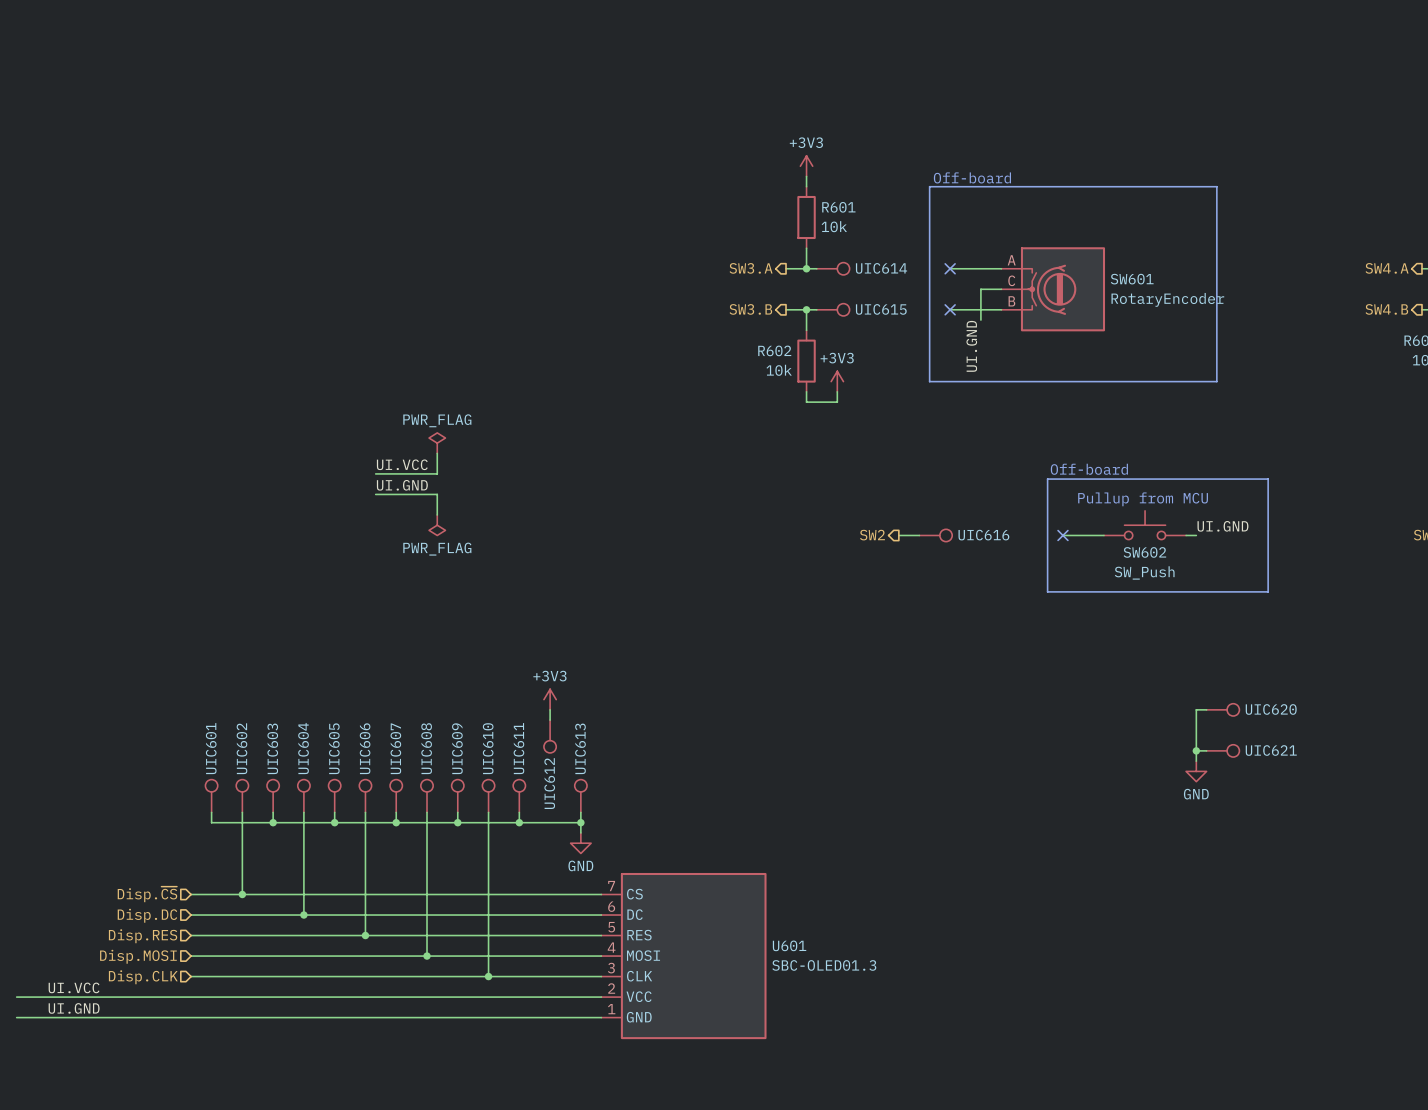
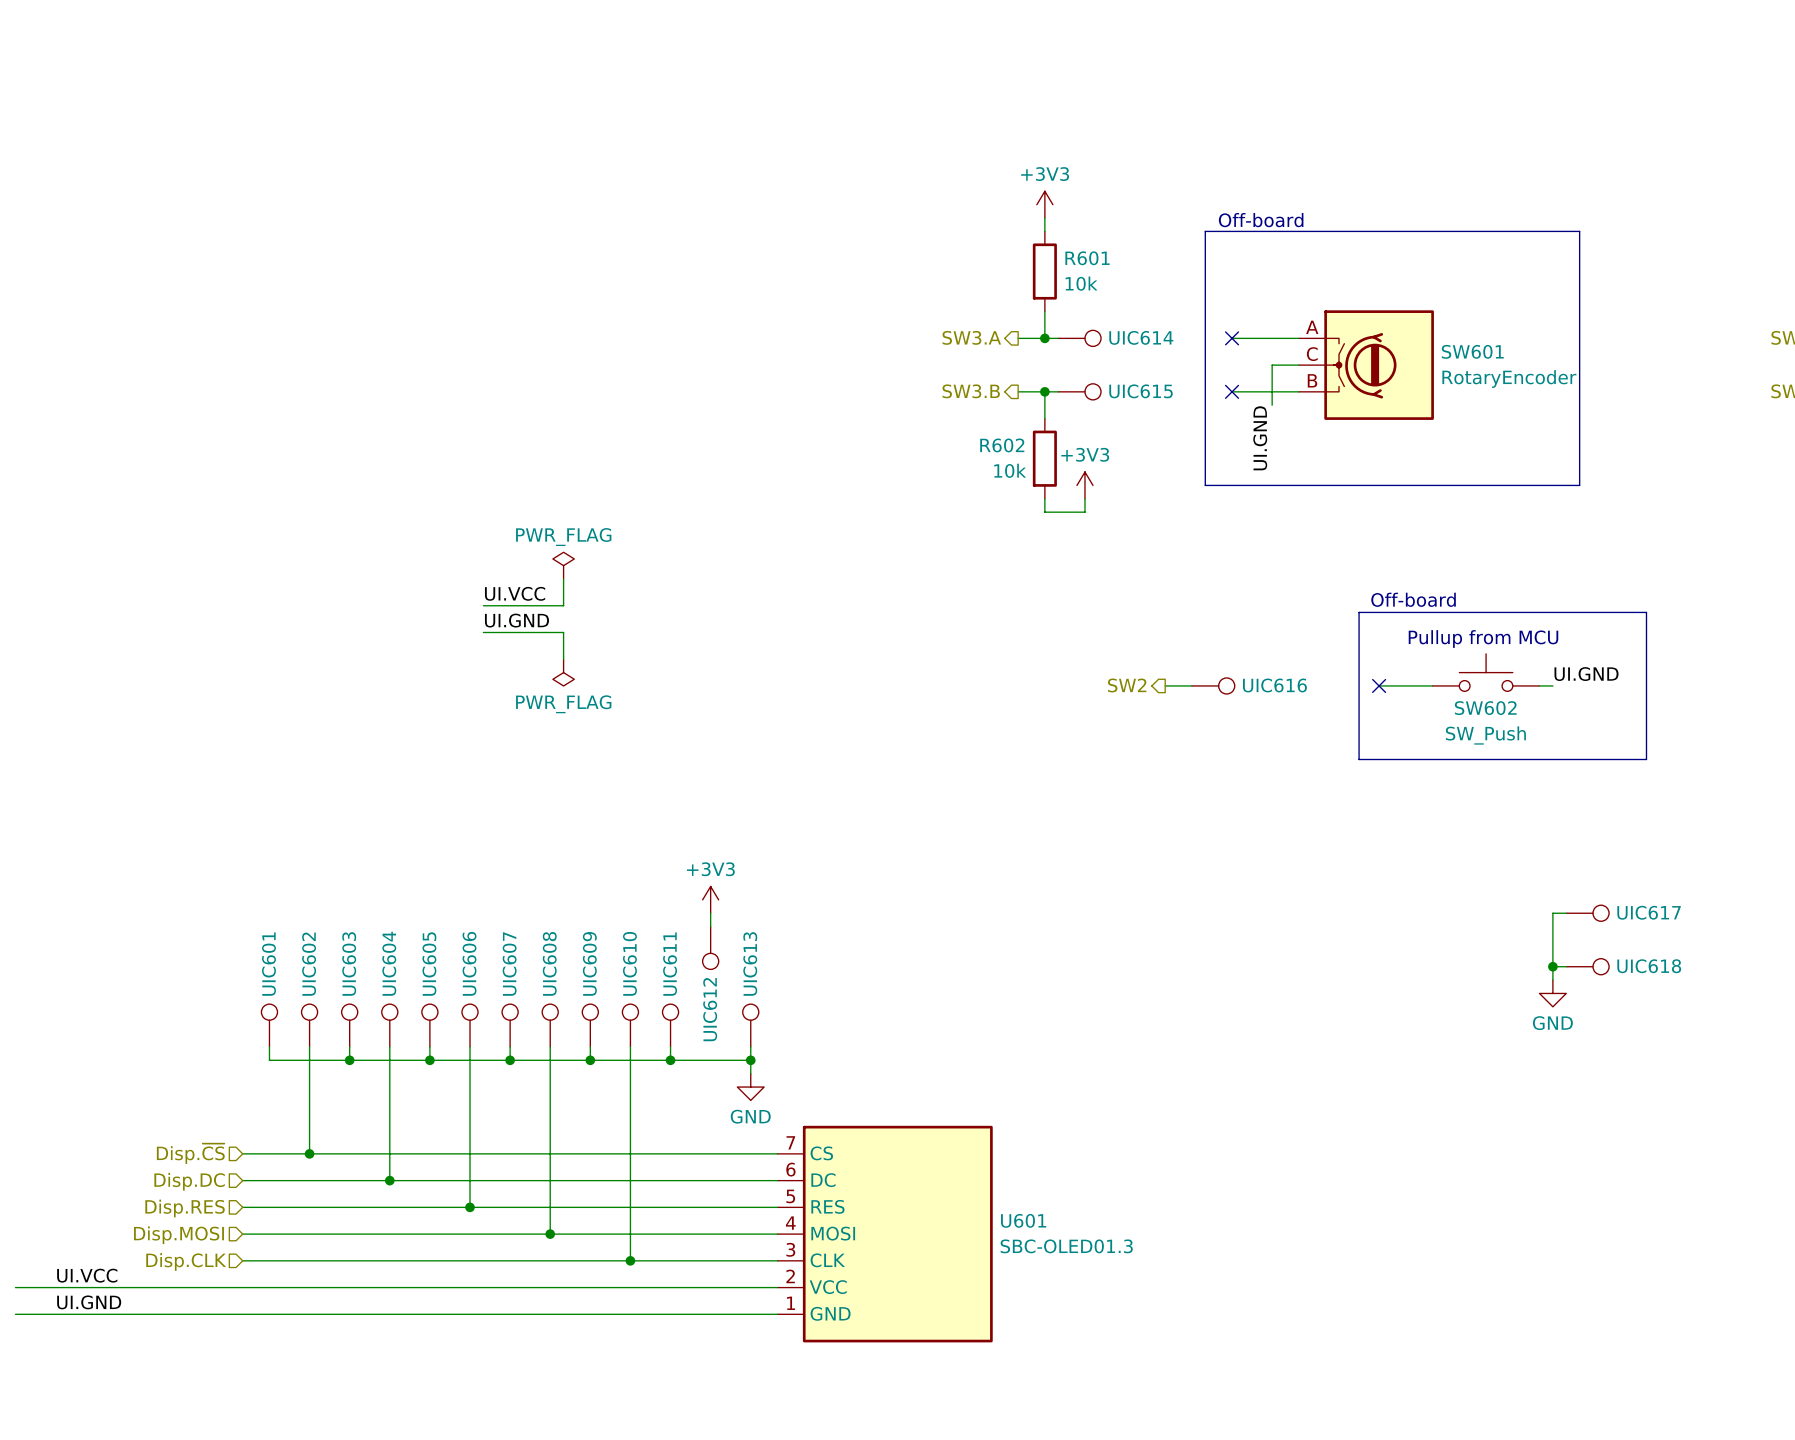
UIC620 name: UIC620 (1271, 709) -> UIC617 (1649, 912)
UIC621 name: UIC621 (1271, 750) -> UIC618 (1649, 966)

